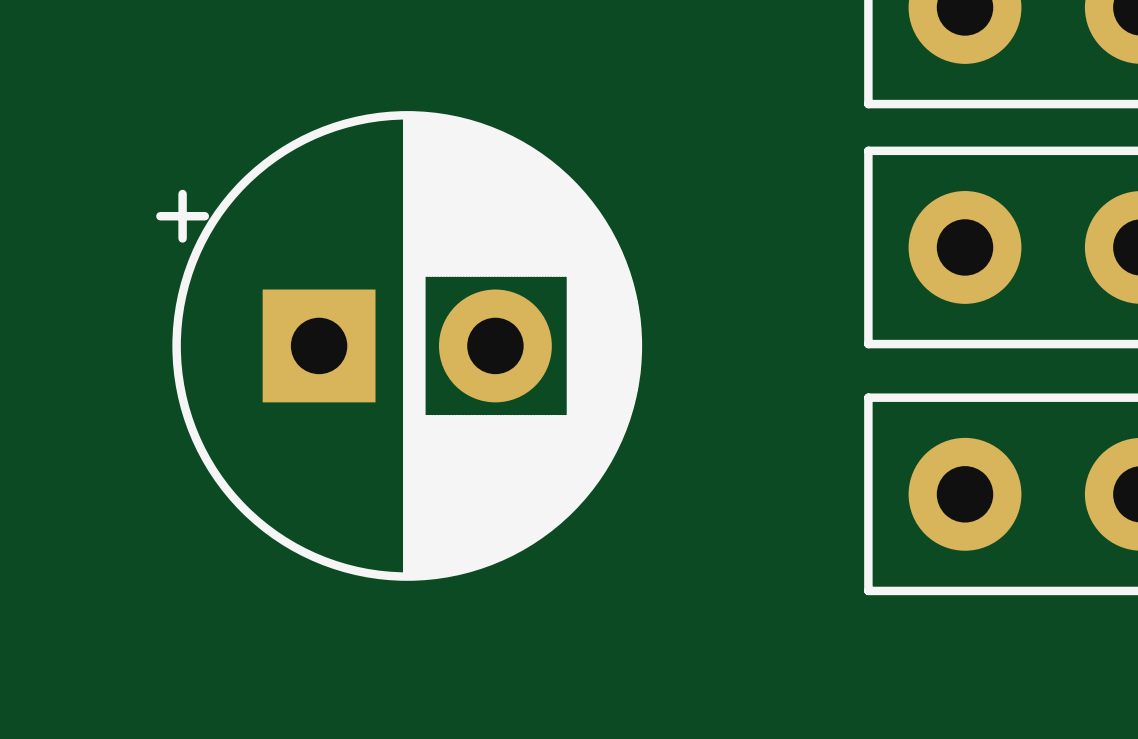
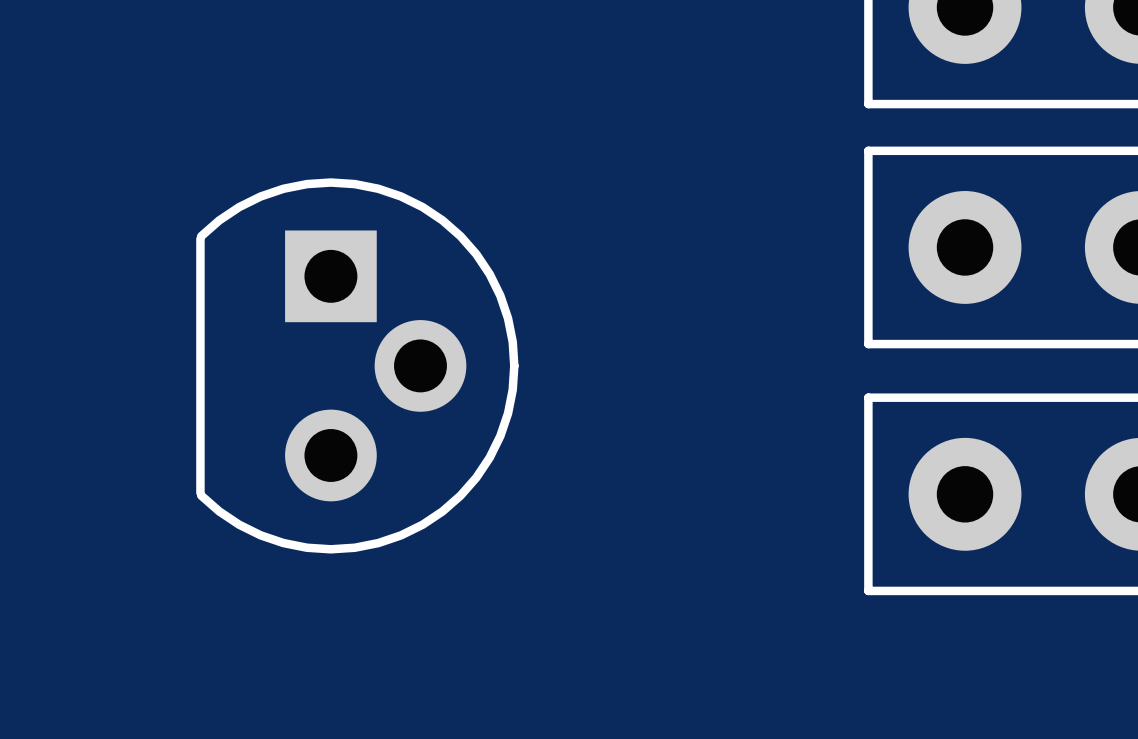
part footprint: [156, 111, 643, 581] -> [196, 178, 519, 554]

